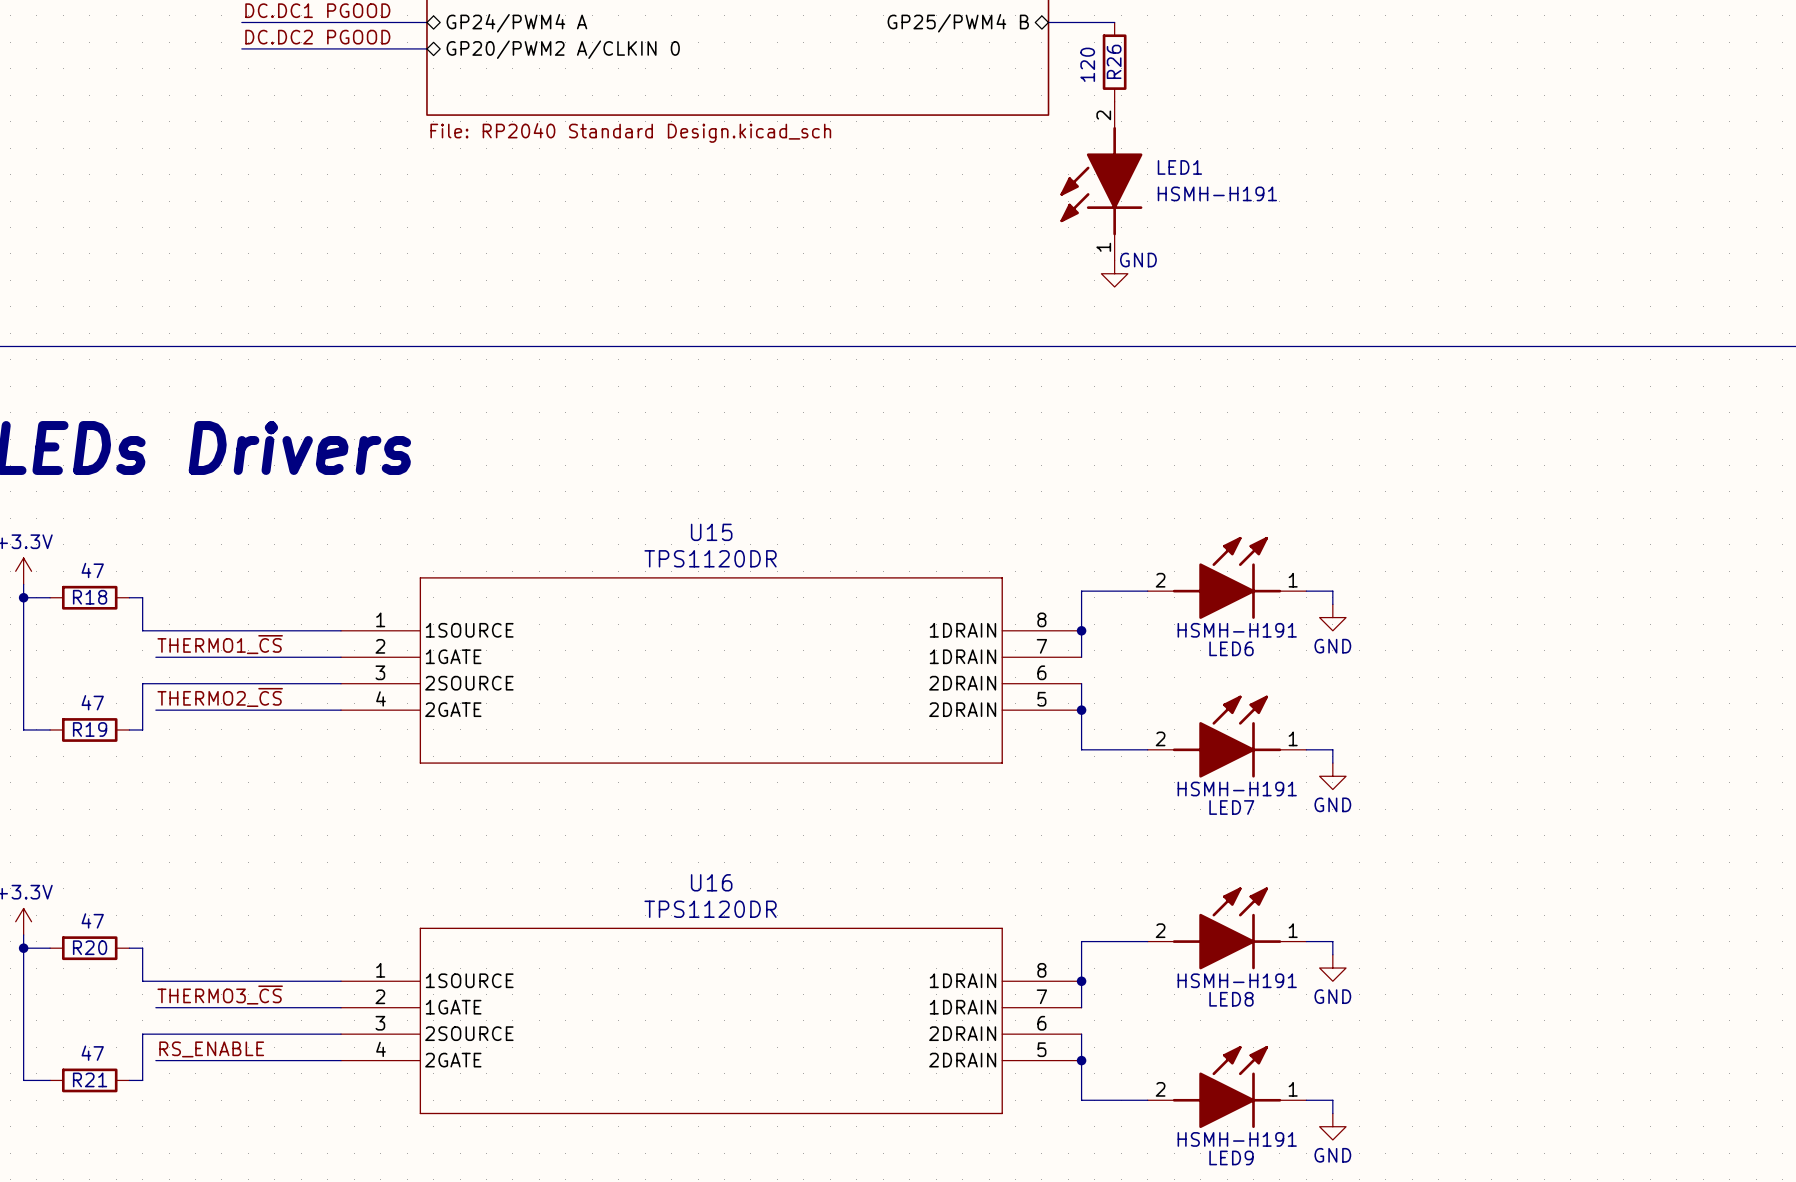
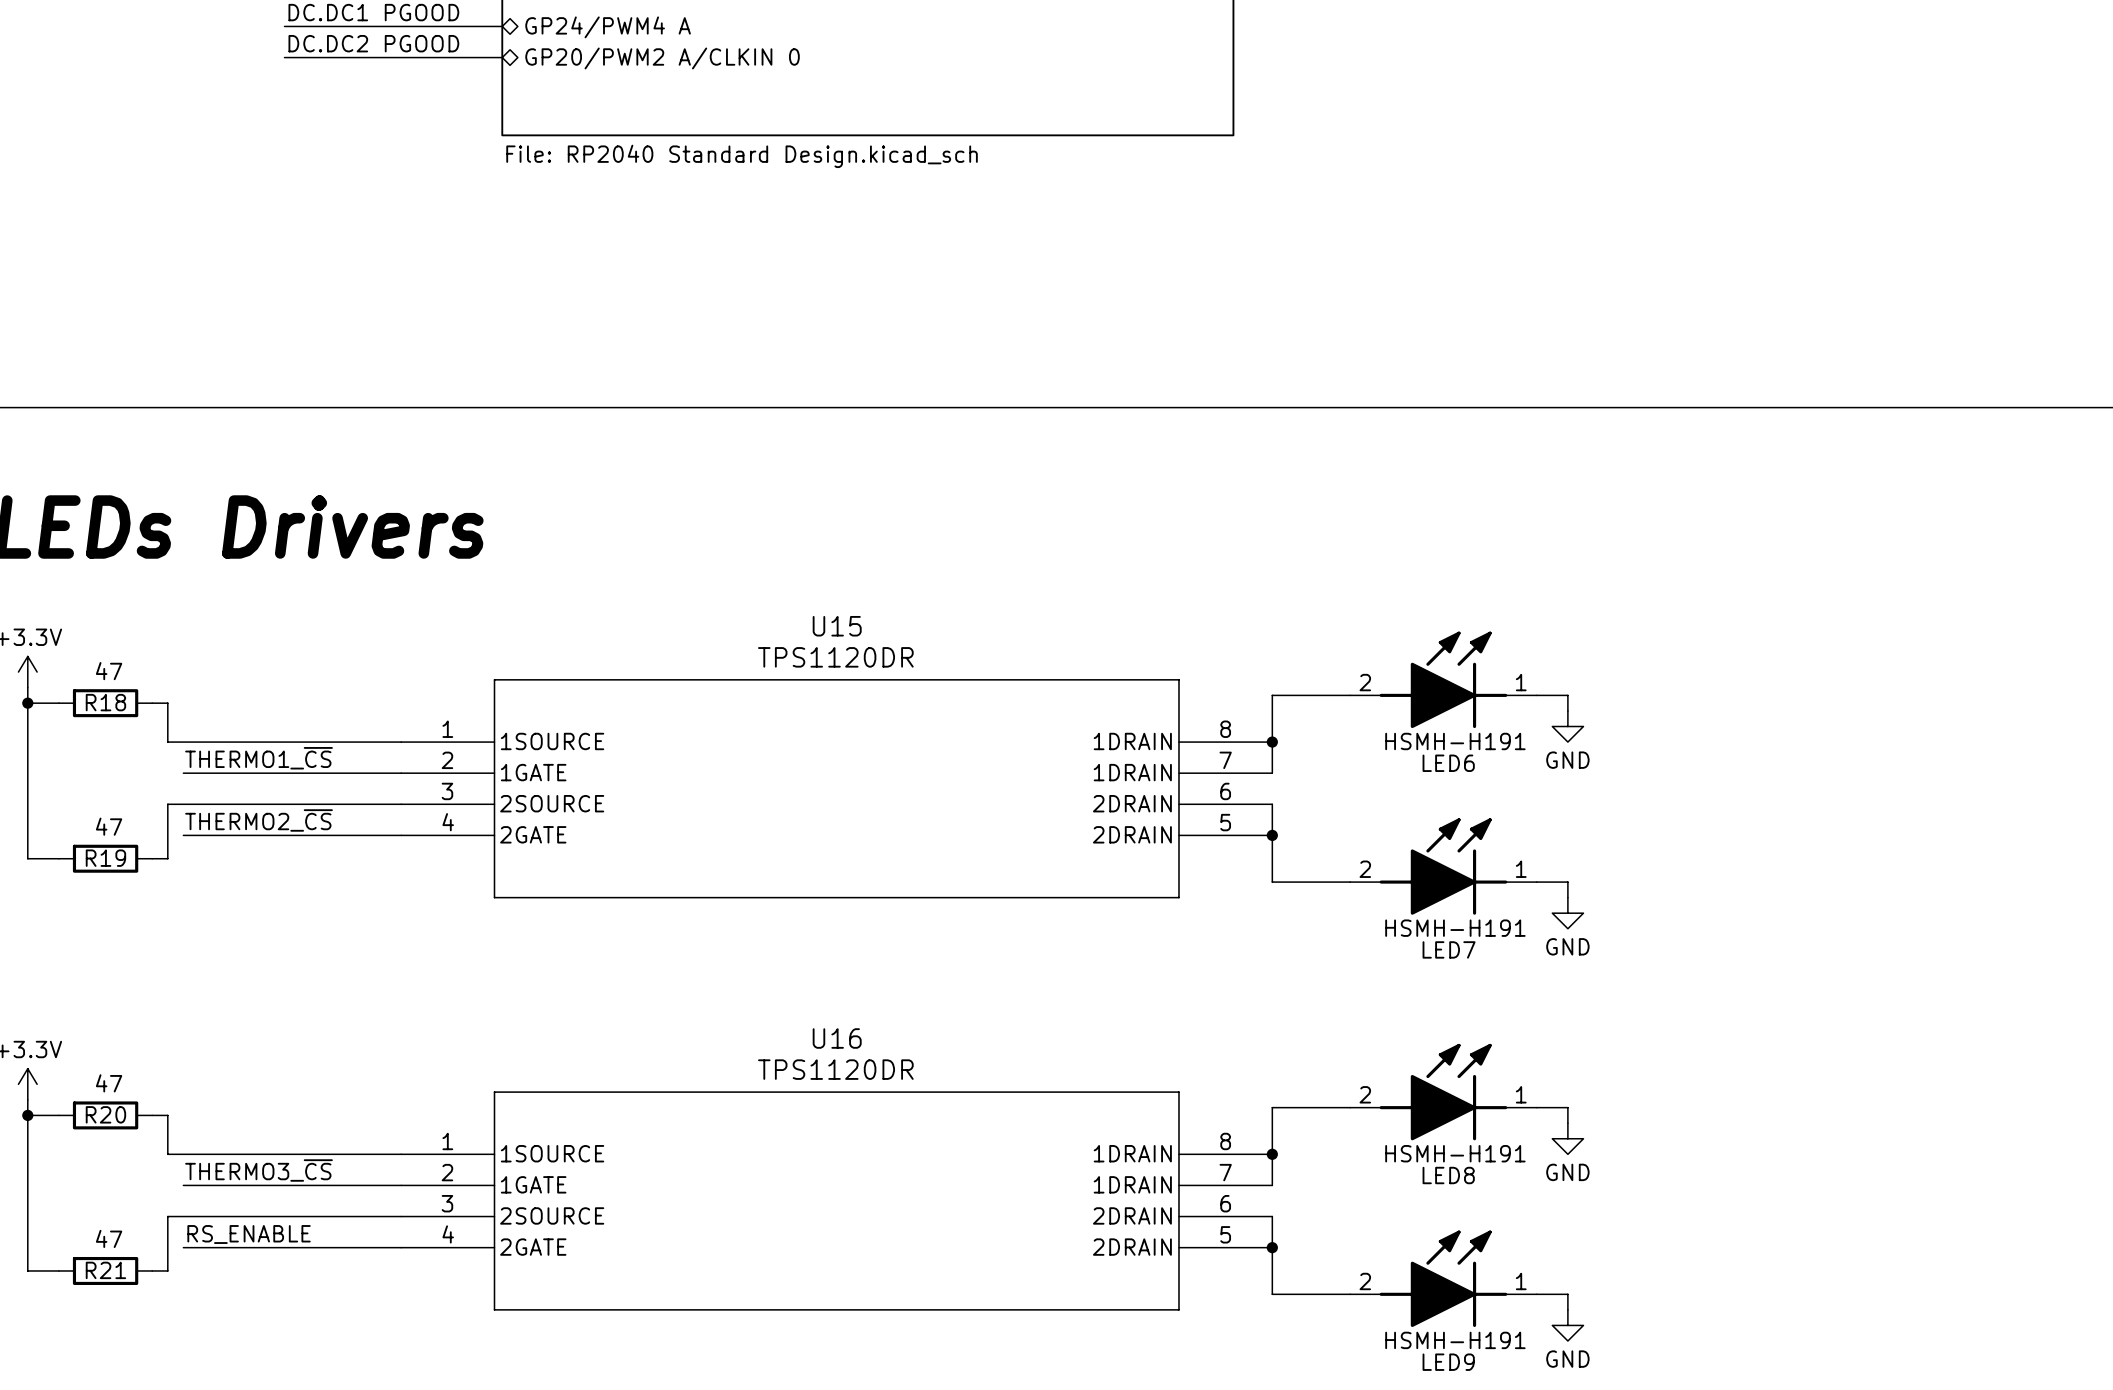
wire: (1048, 22) (1114, 22) -> none
sheet pin: GP25/PWM4 B (958, 23) -> none
R26: 120 (1114, 62) -> none
LED1: HSMH-H191 (1101, 181) -> none
power symbol: GND (1114, 273) -> none

